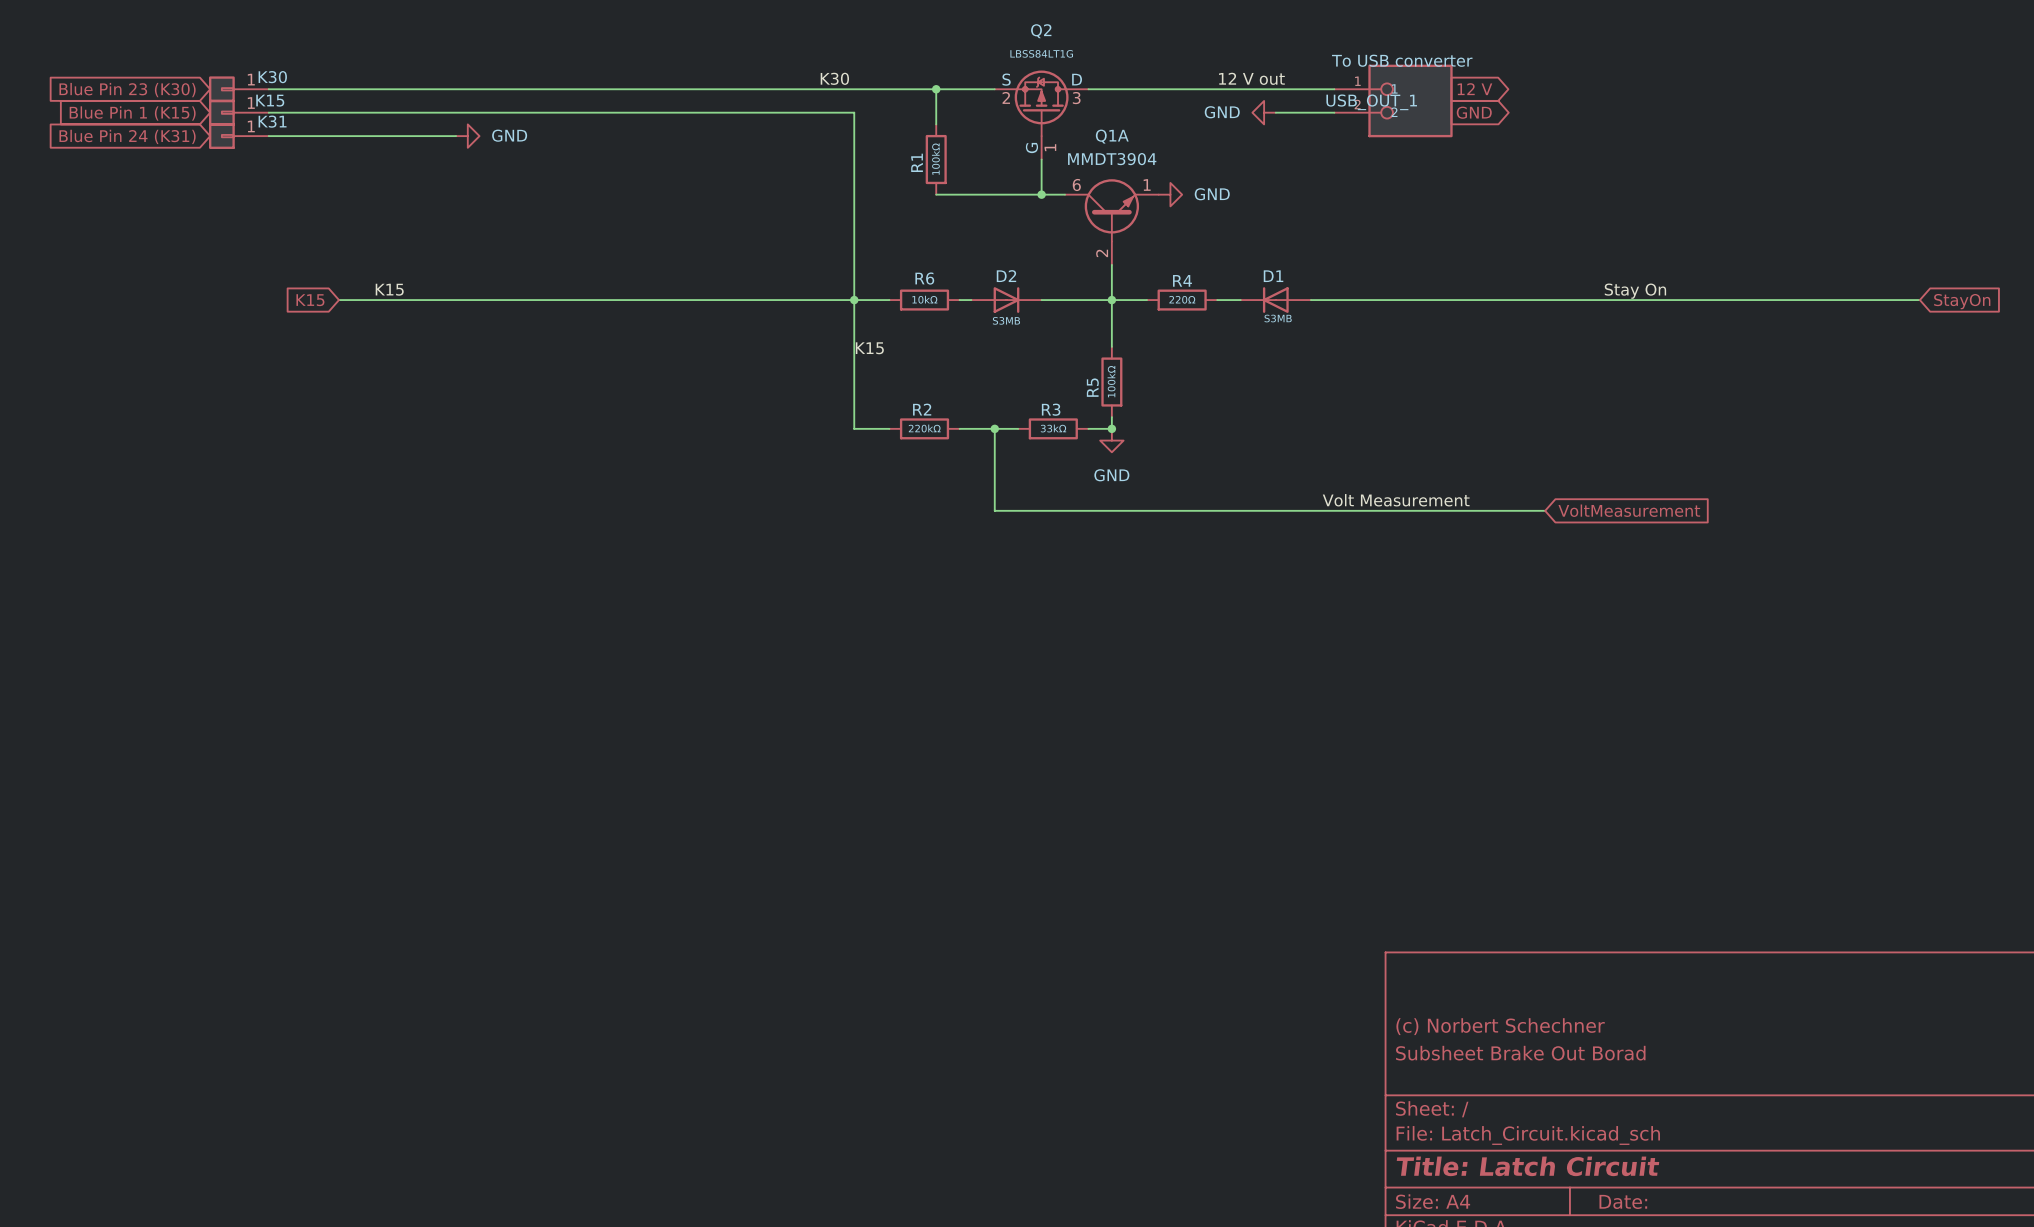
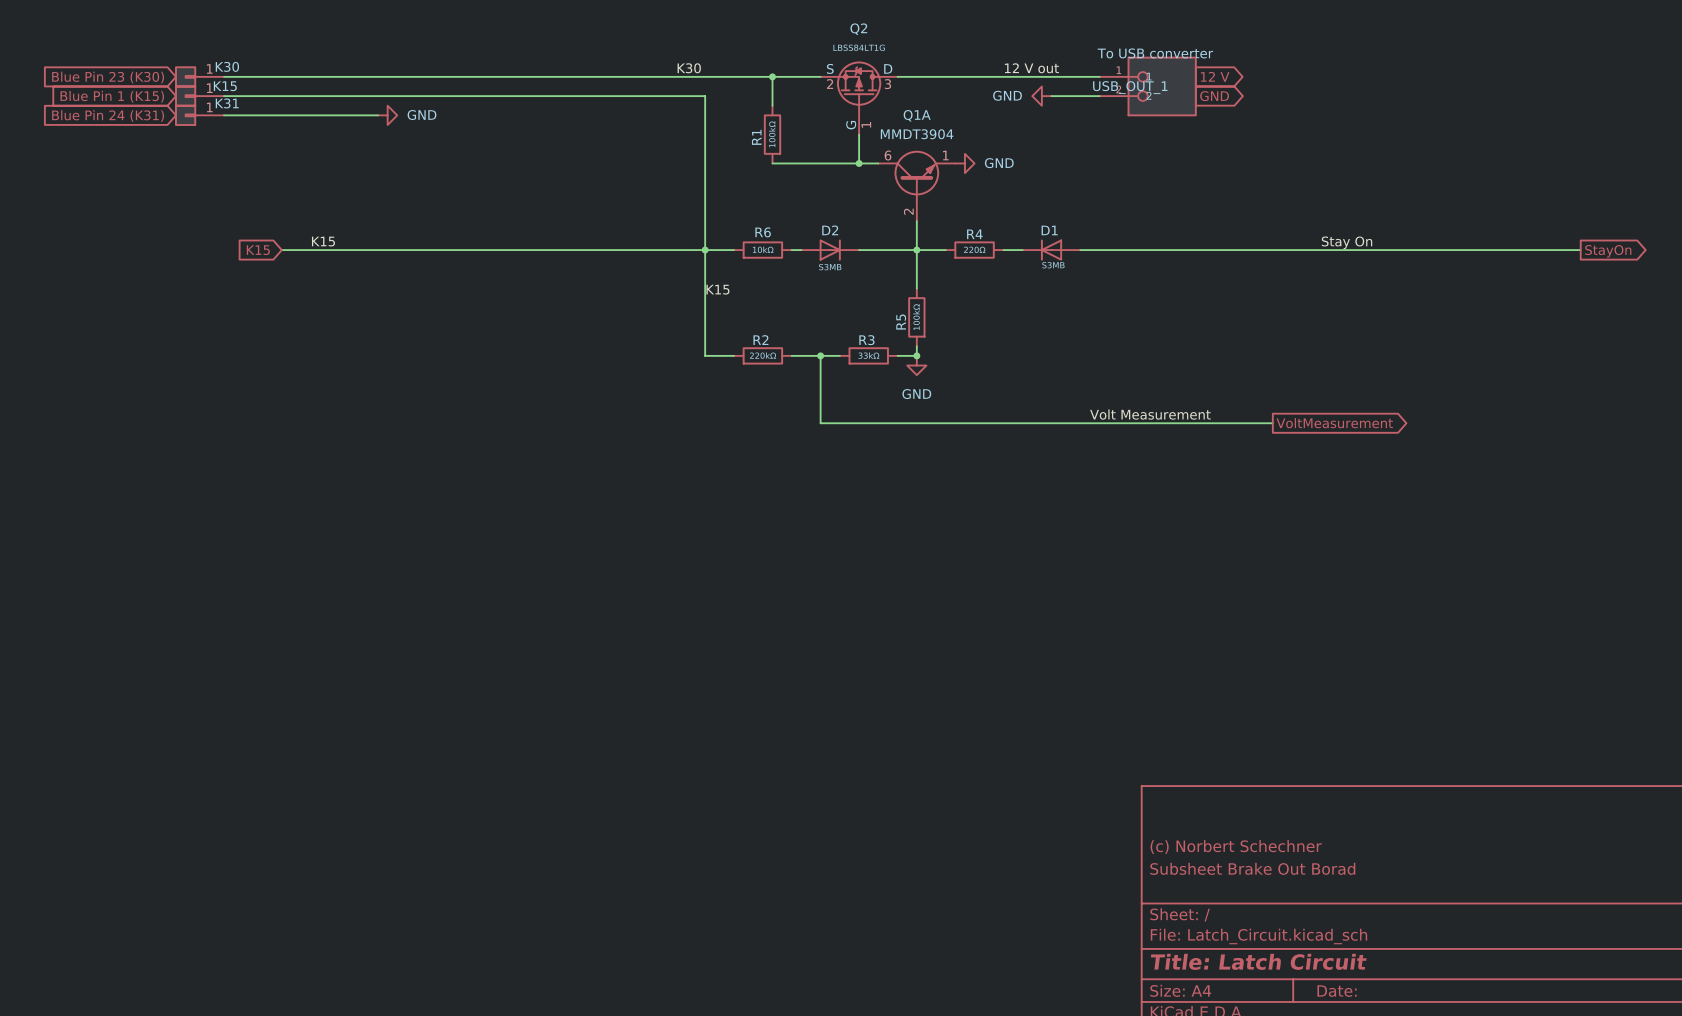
global label shape: input (1962, 301) -> output (1608, 251)
global label shape: input (1629, 510) -> output (1334, 423)

